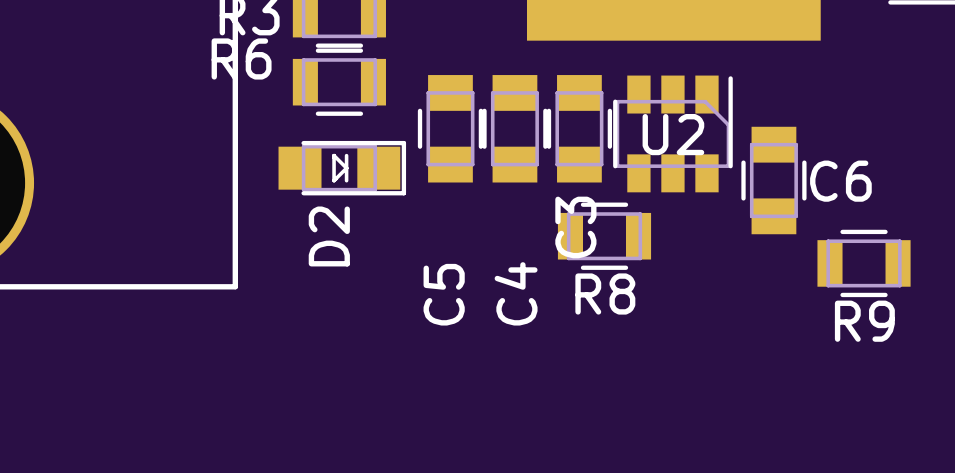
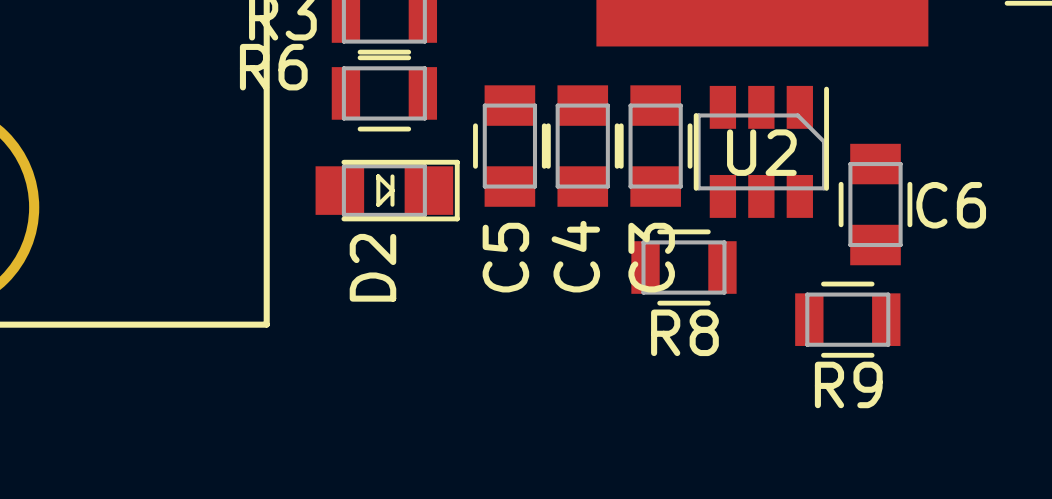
R9 position: (864, 263) -> (847, 319)
C4 name position: C4 (516, 293) -> C4 (575, 256)
C5 name position: C5 (444, 294) -> C5 (505, 257)

